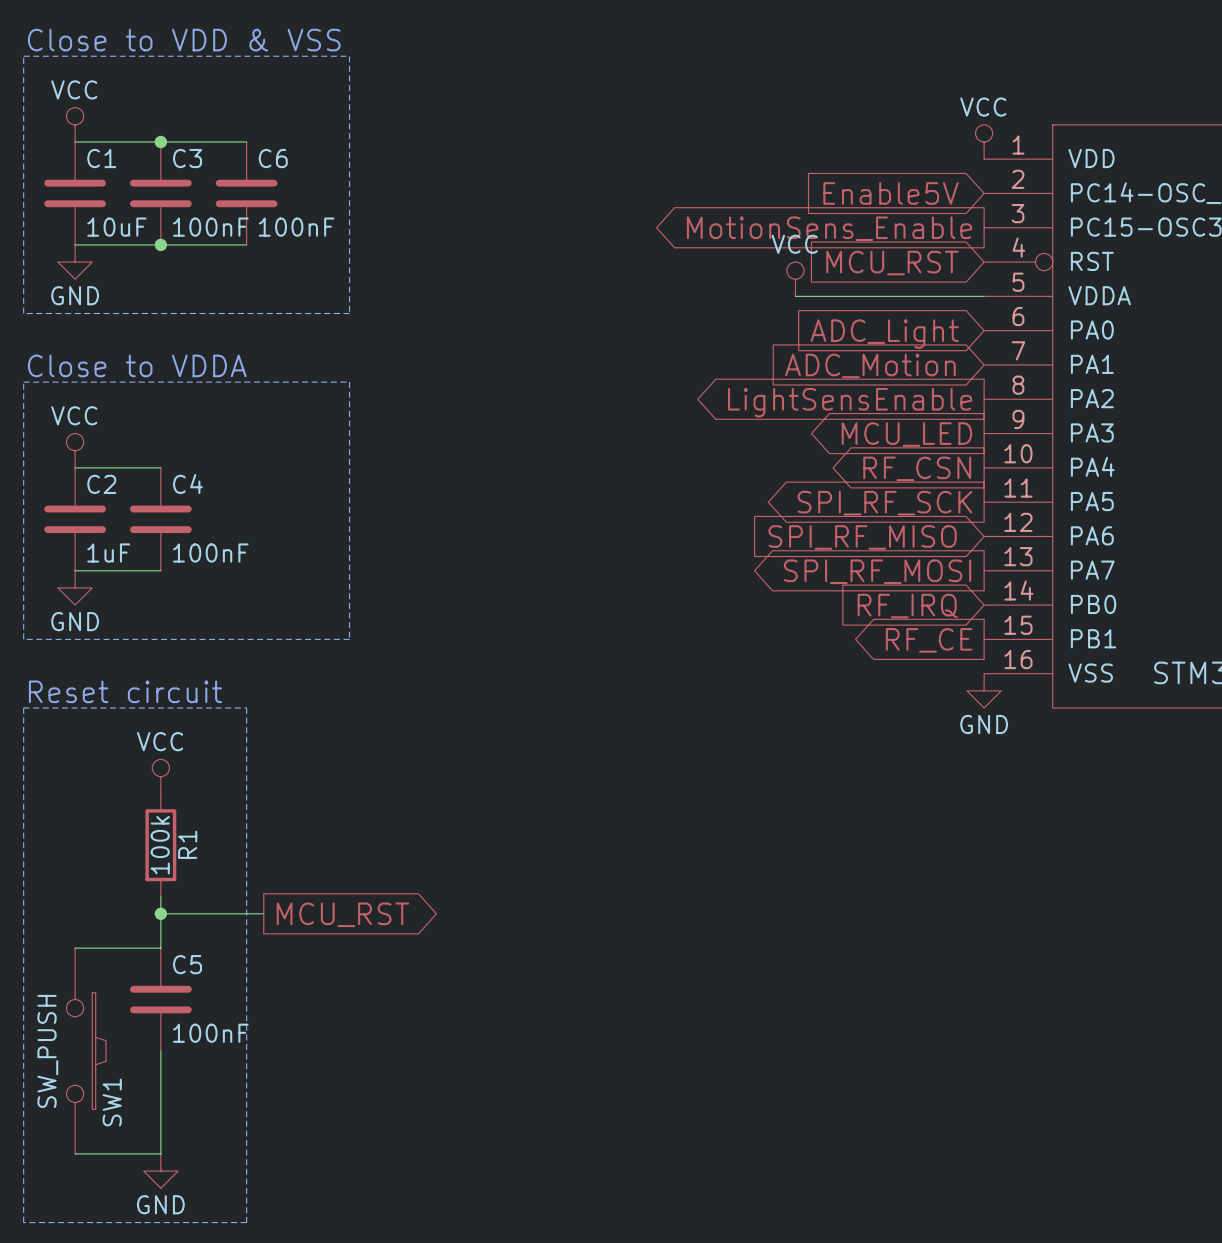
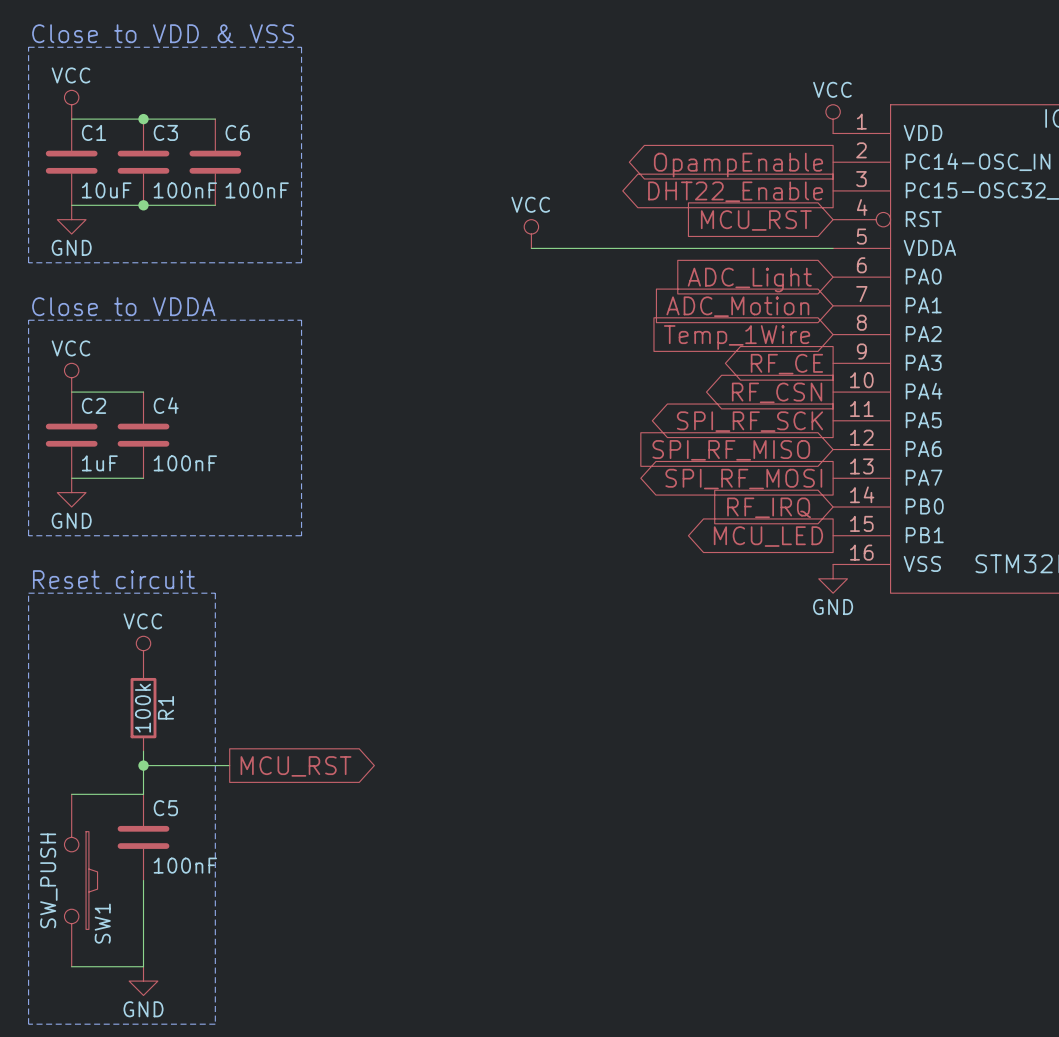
global label shape: input (891, 193) -> output (738, 165)
global label: Enable5V (891, 193) -> OpampEnable (738, 165)
global label: MotionSens_Enable (829, 228) -> DHT22_Enable (735, 191)
power symbol position: VCC (795, 279) -> VCC (531, 234)
wire: none -> (531, 248) (675, 248)
global label shape: output (850, 402) -> input (737, 337)
global label: LightSensEnable (850, 402) -> Temp_1Wire (737, 337)
global label: MCU_LED (906, 434) -> RF_CE (786, 364)
global label: RF_CE (929, 640) -> MCU_LED (768, 536)

